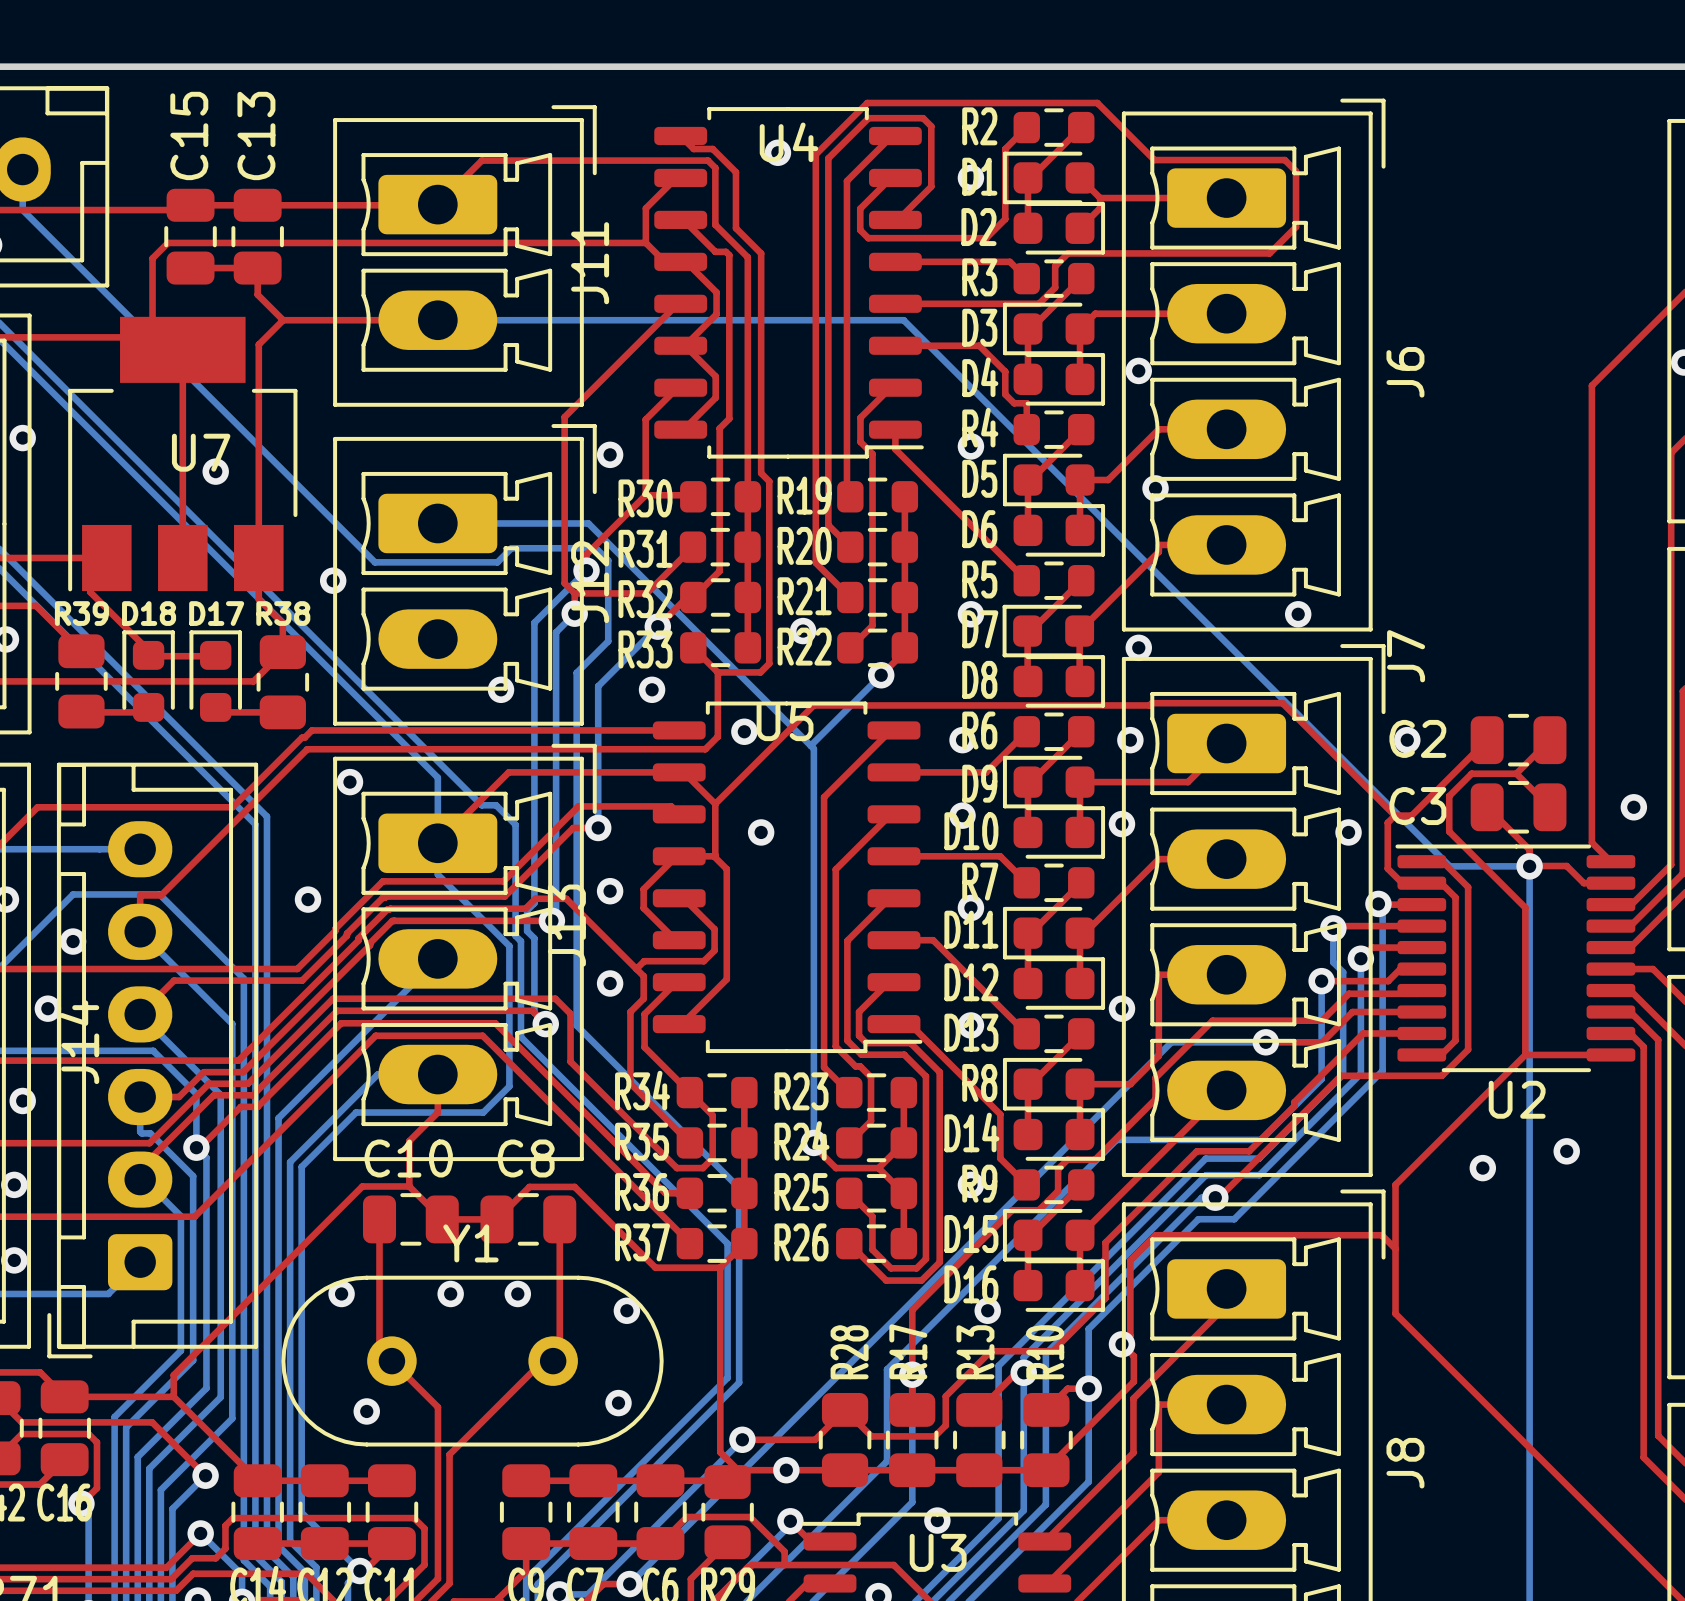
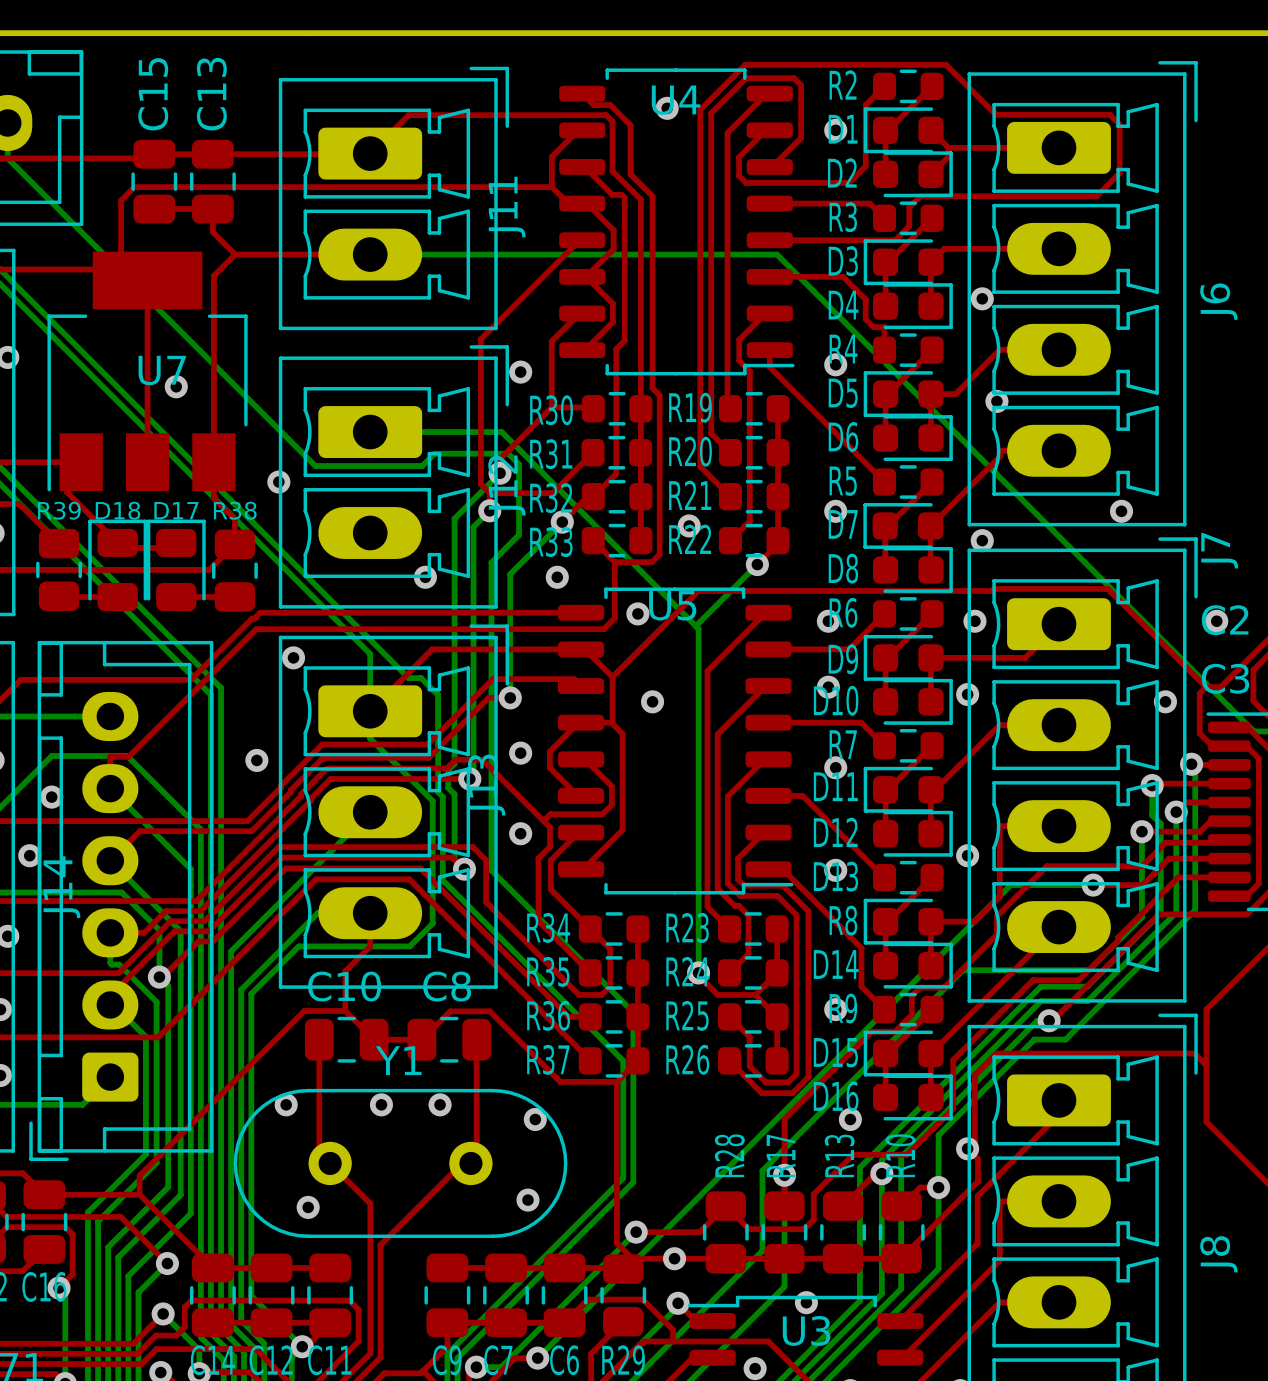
D18 footprint: [122, 630, 175, 722] -> [88, 519, 148, 612]
D17 footprint: [189, 630, 242, 722] -> [146, 519, 206, 612]

